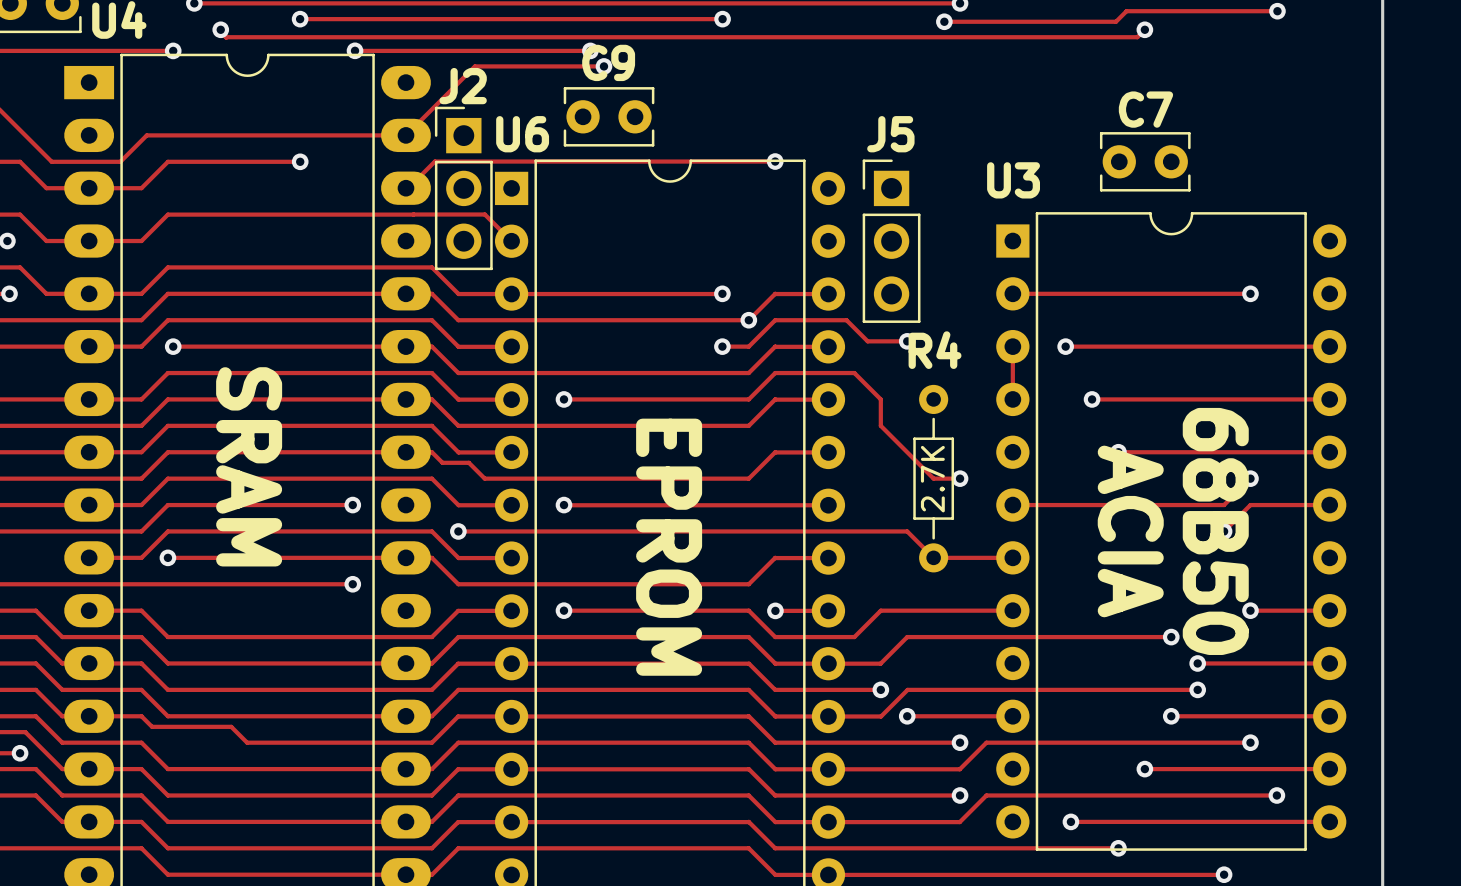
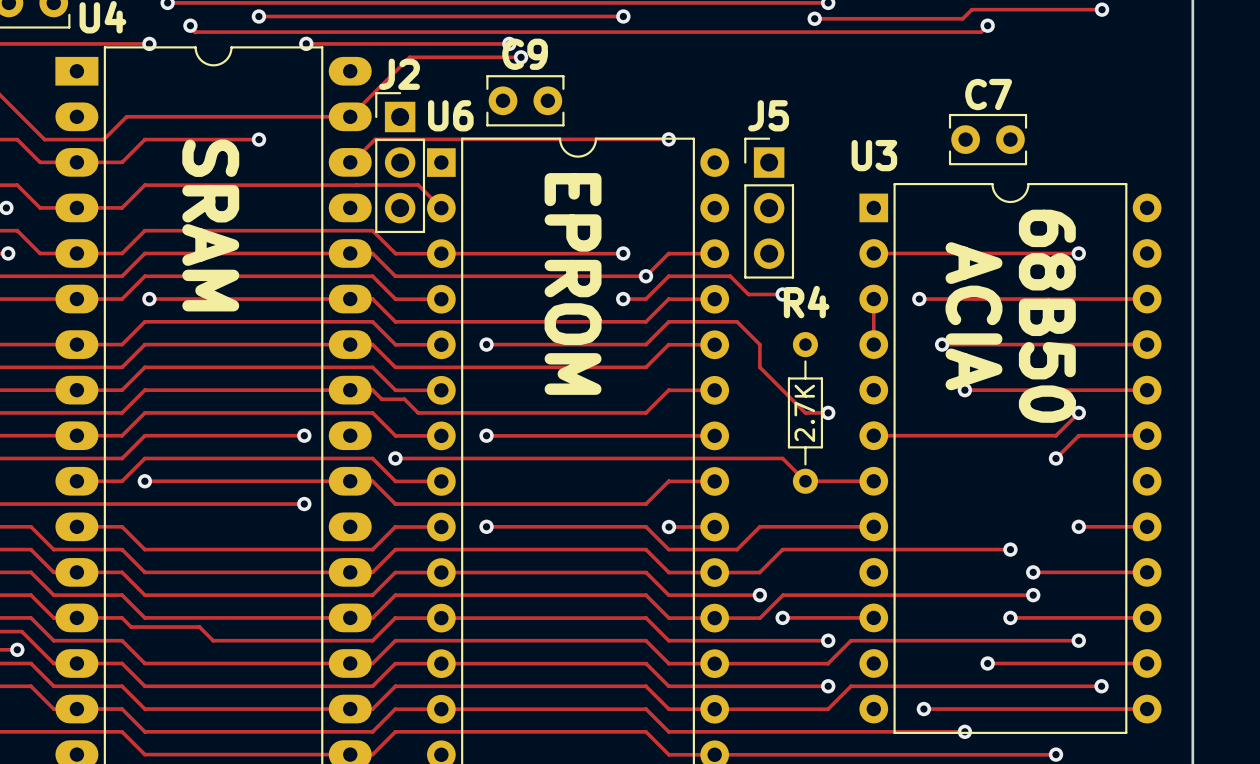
text position: SRAM (249, 466) -> SRAM (210, 225)
text position: ACIA (1130, 531) -> ACIA (974, 316)
text position: 68B50 (1215, 531) -> 68B50 (1047, 316)
text position: EPROM (669, 547) -> EPROM (573, 283)

